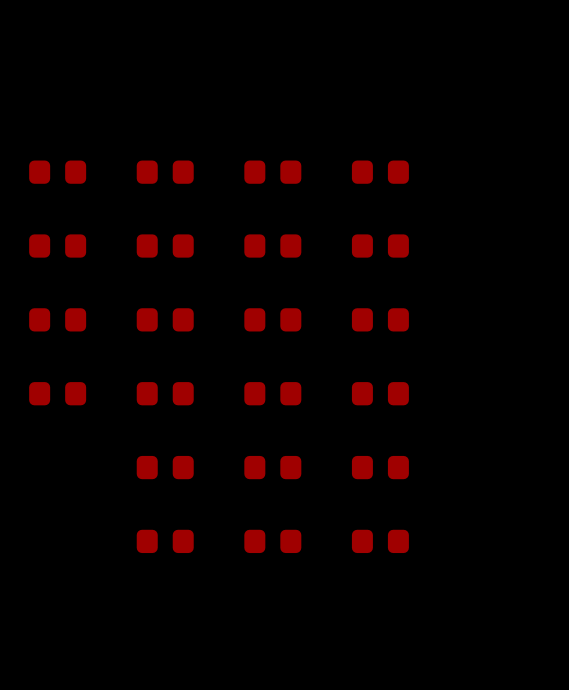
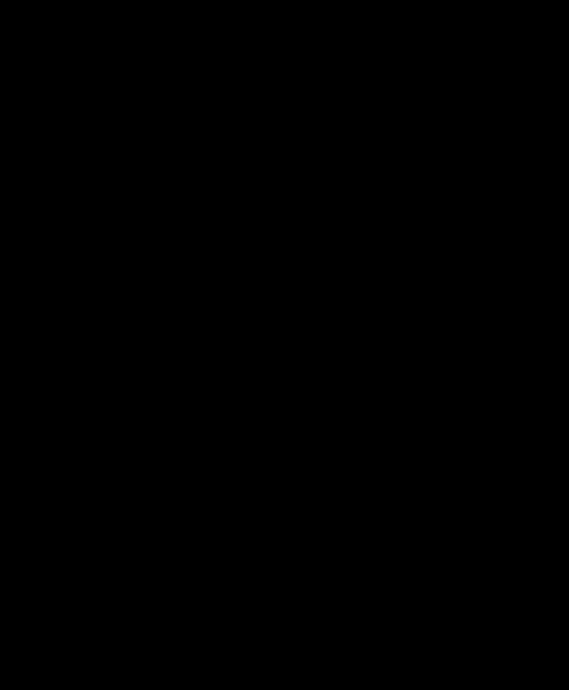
part: (57, 172) -> none
part: (165, 172) -> none
part: (272, 172) -> none
part: (380, 172) -> none
part: (57, 246) -> none
part: (165, 246) -> none
part: (272, 246) -> none
part: (380, 246) -> none
part: (57, 319) -> none
part: (165, 319) -> none
part: (272, 319) -> none
part: (380, 319) -> none
part: (57, 393) -> none
part: (165, 393) -> none
part: (272, 393) -> none
part: (380, 393) -> none
part: (165, 467) -> none
part: (272, 467) -> none
part: (380, 467) -> none
part: (165, 541) -> none
part: (272, 541) -> none
part: (380, 541) -> none

